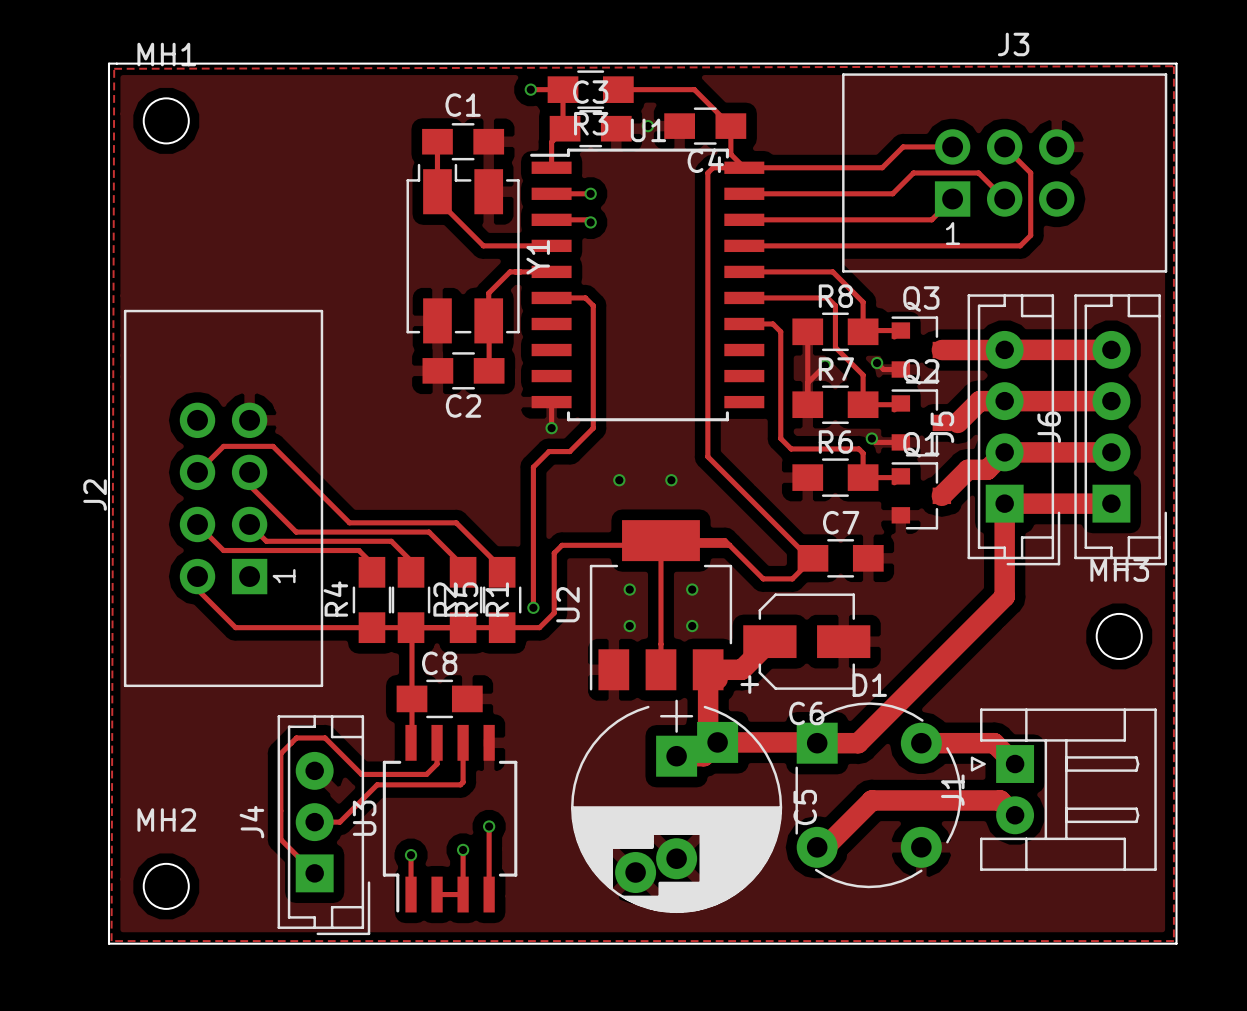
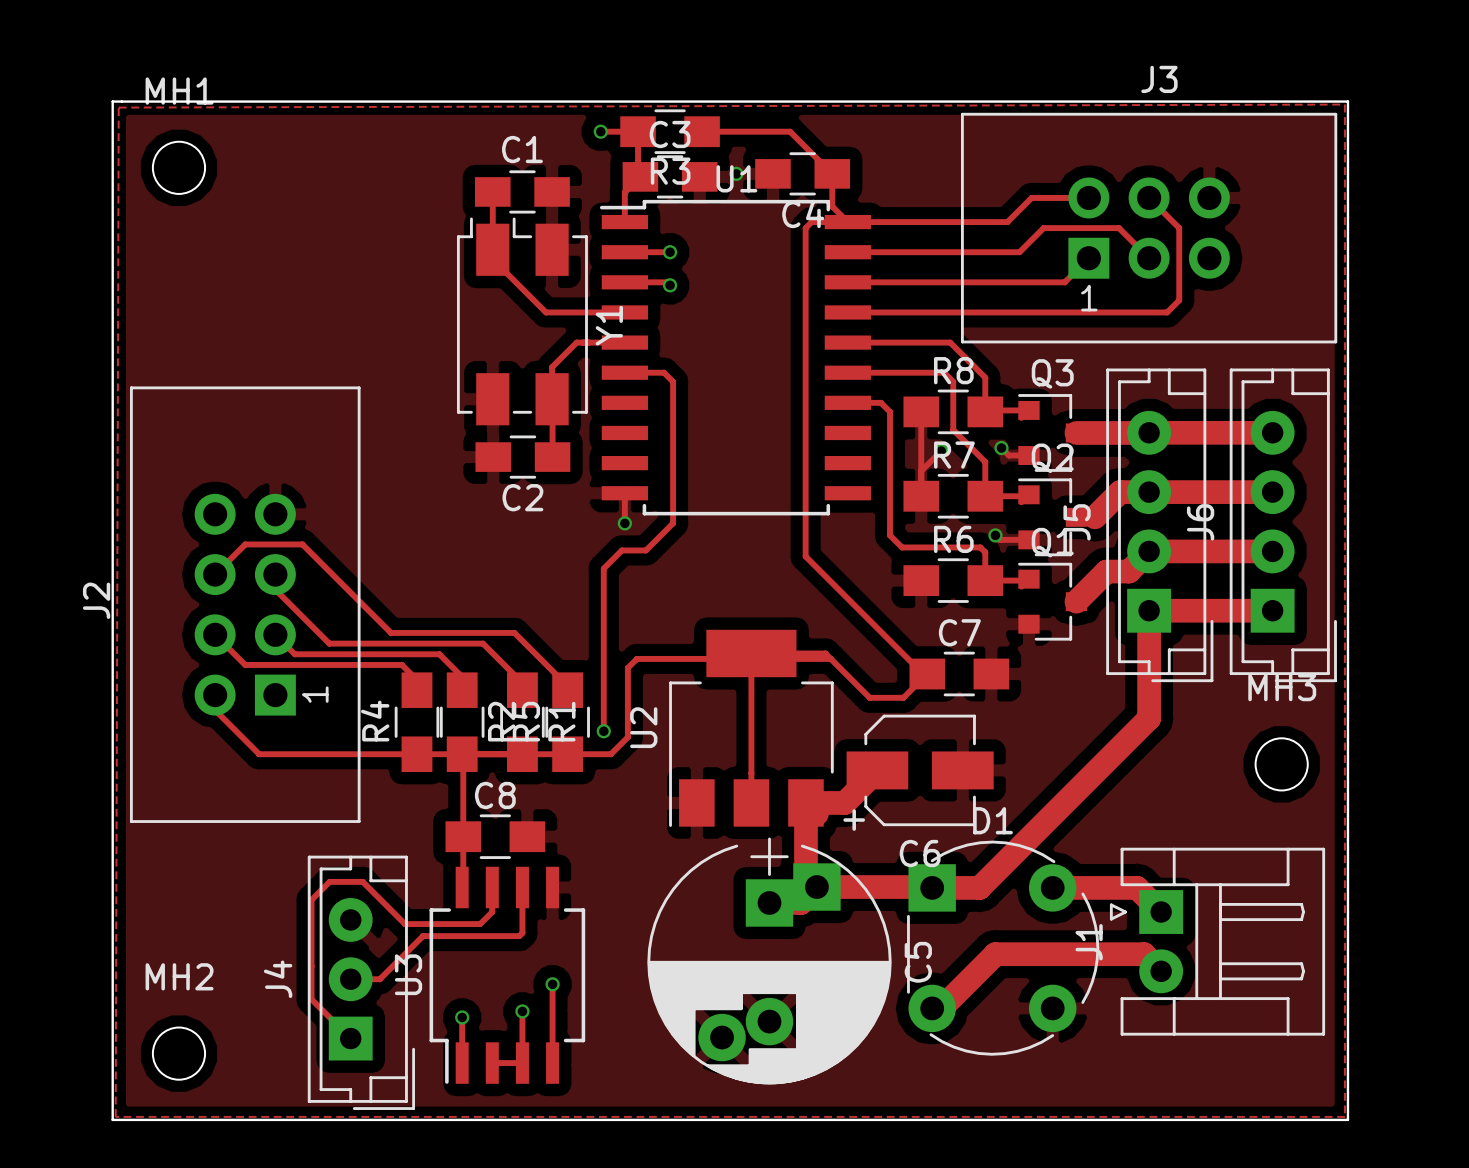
via: (619, 480) -> none
via: (671, 480) -> none
via: (629, 589) -> none
via: (692, 589) -> none
via: (629, 626) -> none
via: (692, 626) -> none

